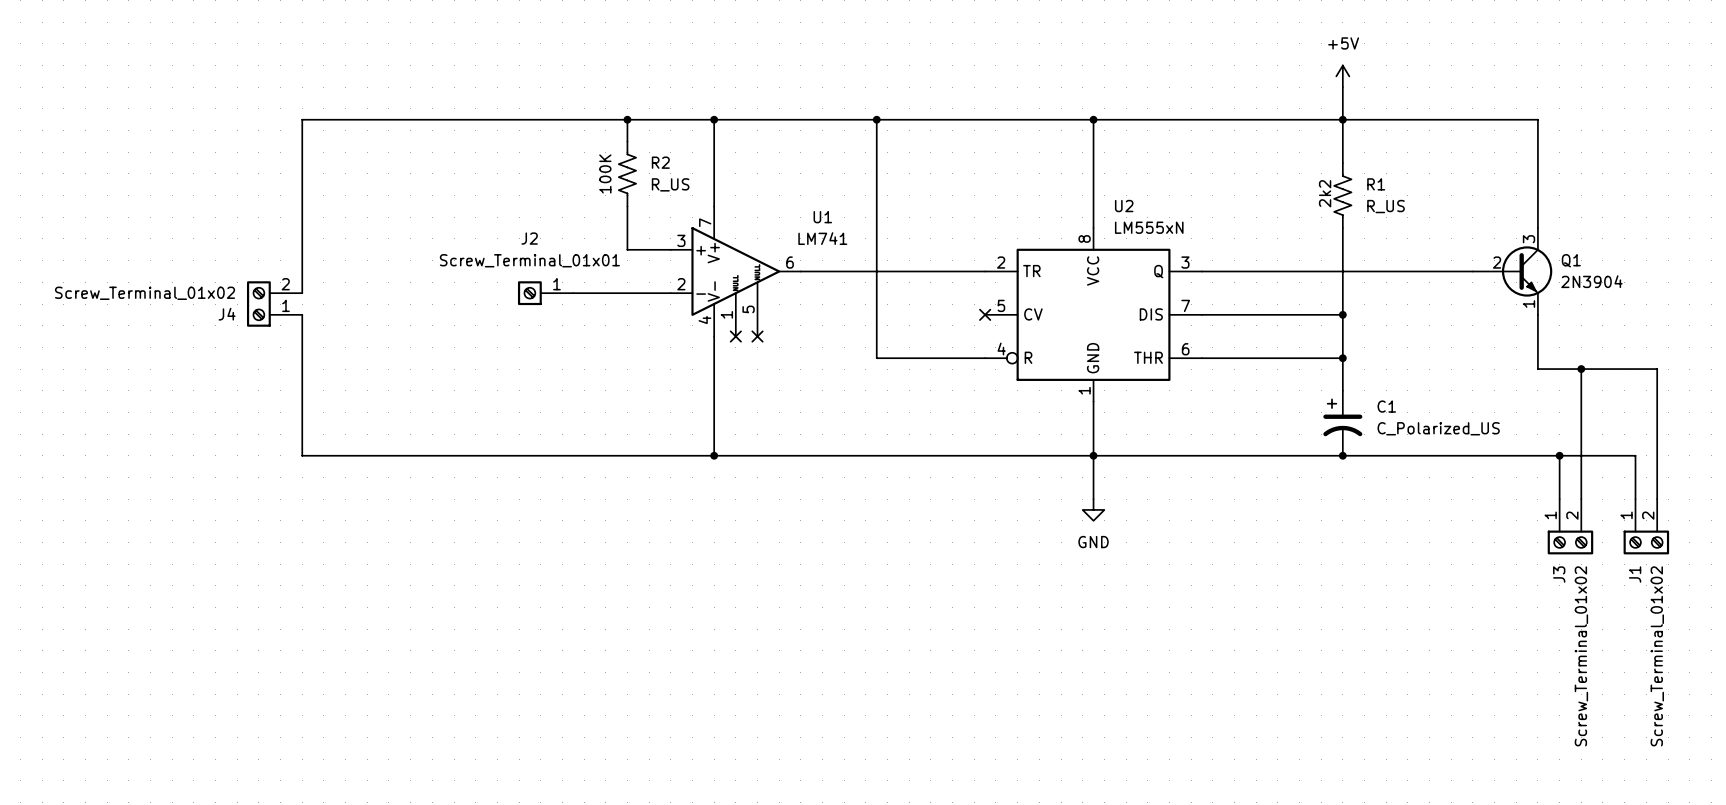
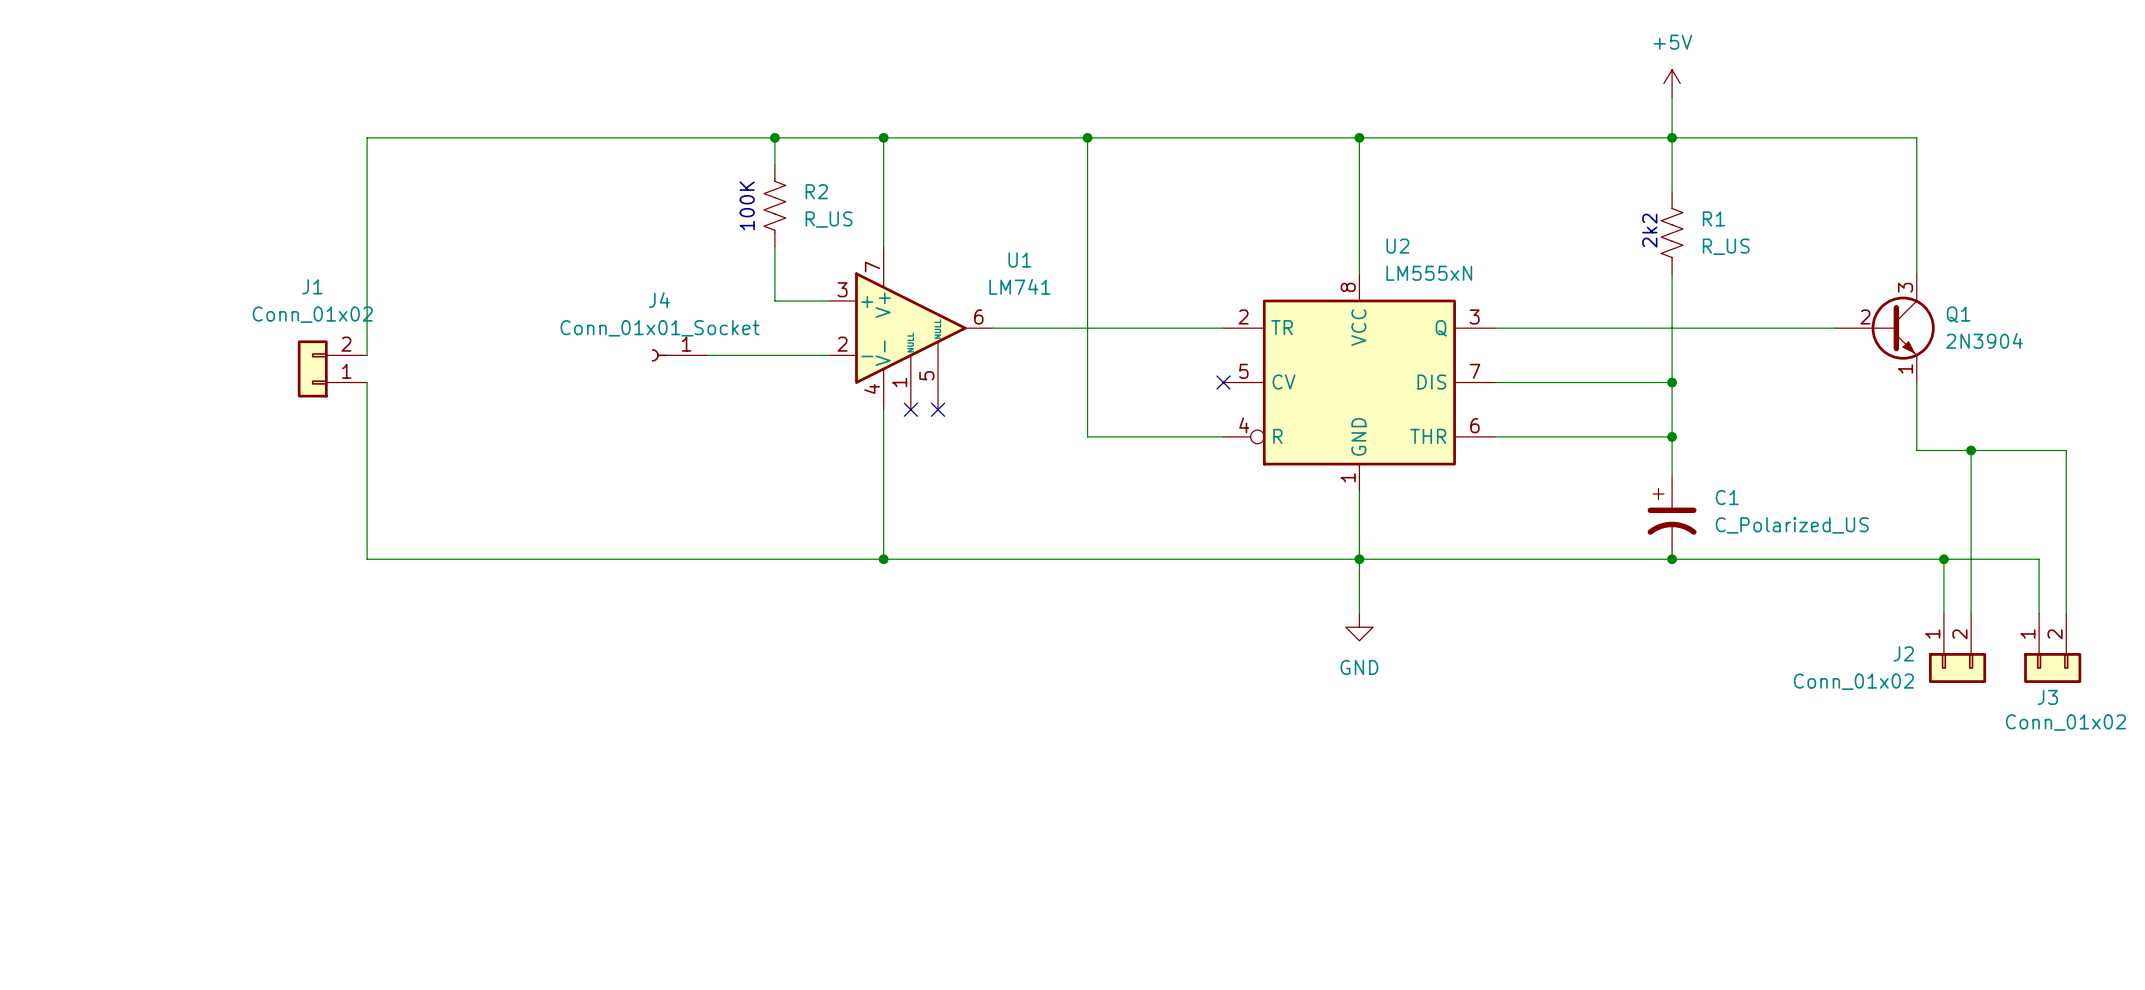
J2 name position: J2 (529, 238) -> J2 (1903, 653)
J2 value: Screw_Terminal_01x01 (529, 260) -> Conn_01x02 (1853, 681)
J4 symbol: [246, 281, 303, 327] -> [651, 349, 707, 362]
J2 symbol: [517, 281, 574, 306] -> [1928, 613, 1987, 683]
J4 value: Screw_Terminal_01x02 (145, 293) -> Conn_01x01_Socket (660, 328)
J4 name position: J4 (227, 314) -> J4 (659, 300)
J3 symbol: [1547, 499, 1594, 555] -> [2024, 613, 2082, 683]
J1 symbol: [1623, 499, 1670, 555] -> [297, 340, 368, 398]
J1 name position: J1 (1635, 574) -> J1 (312, 286)
J3 value: Screw_Terminal_01x02 (1581, 656) -> Conn_01x02 (2065, 722)
J1 value: Screw_Terminal_01x02 (1657, 656) -> Conn_01x02 (312, 314)

